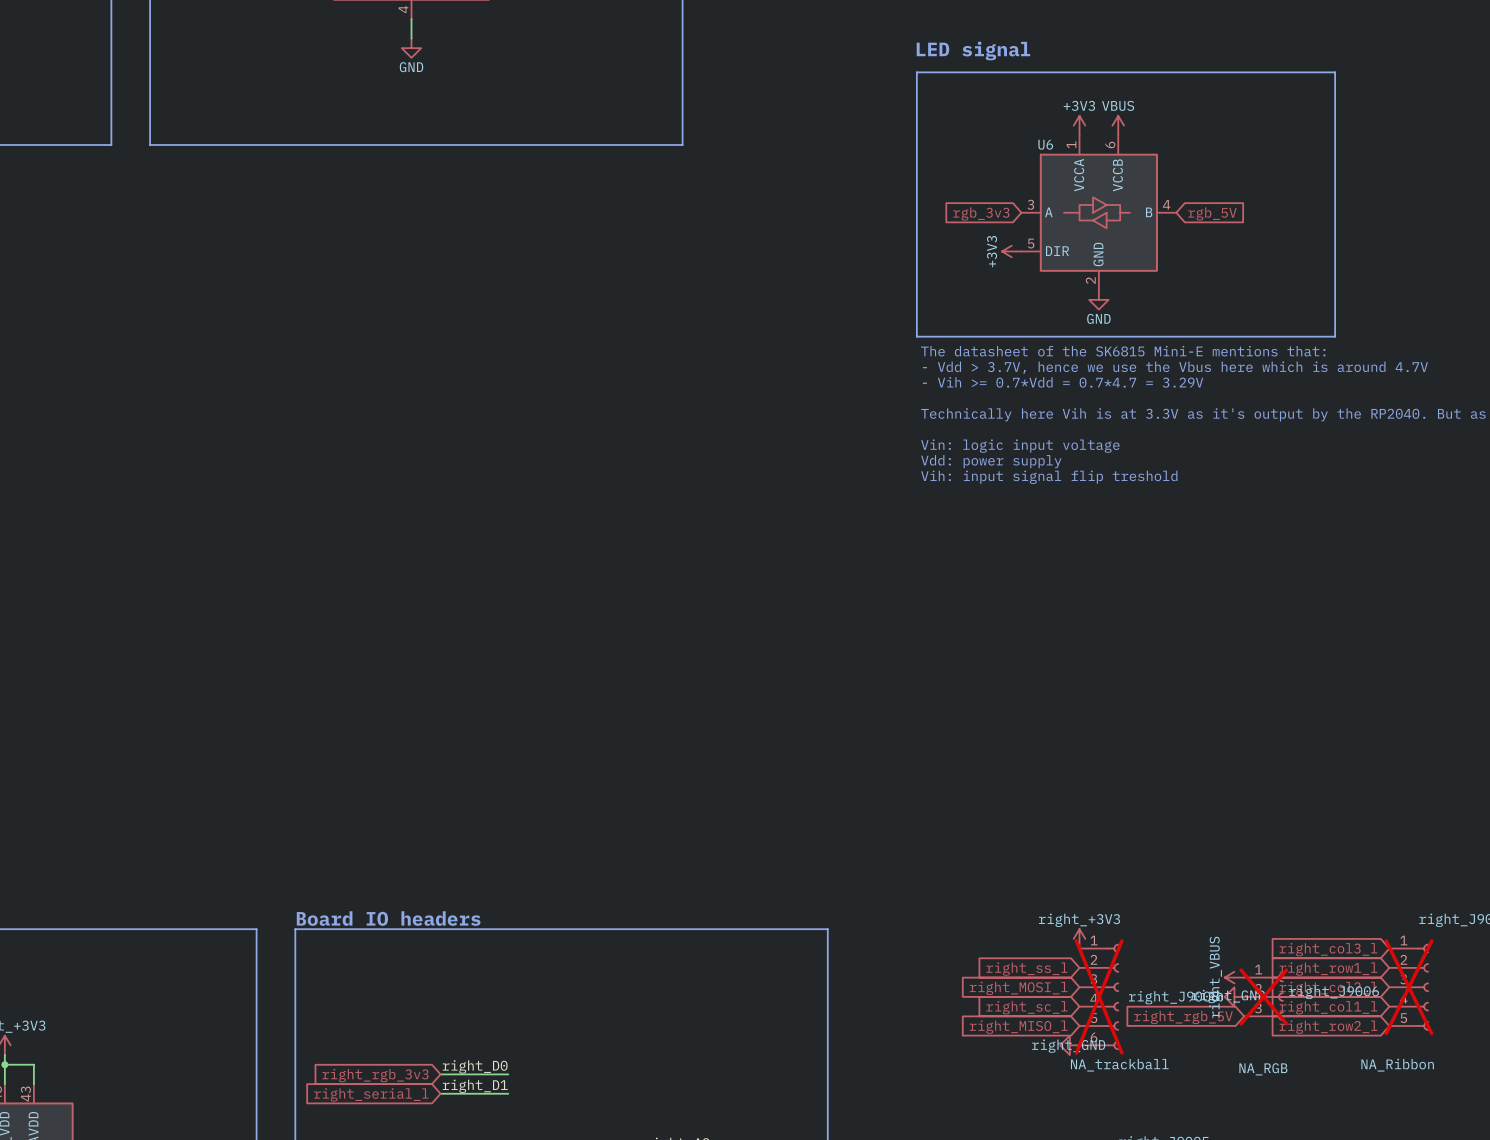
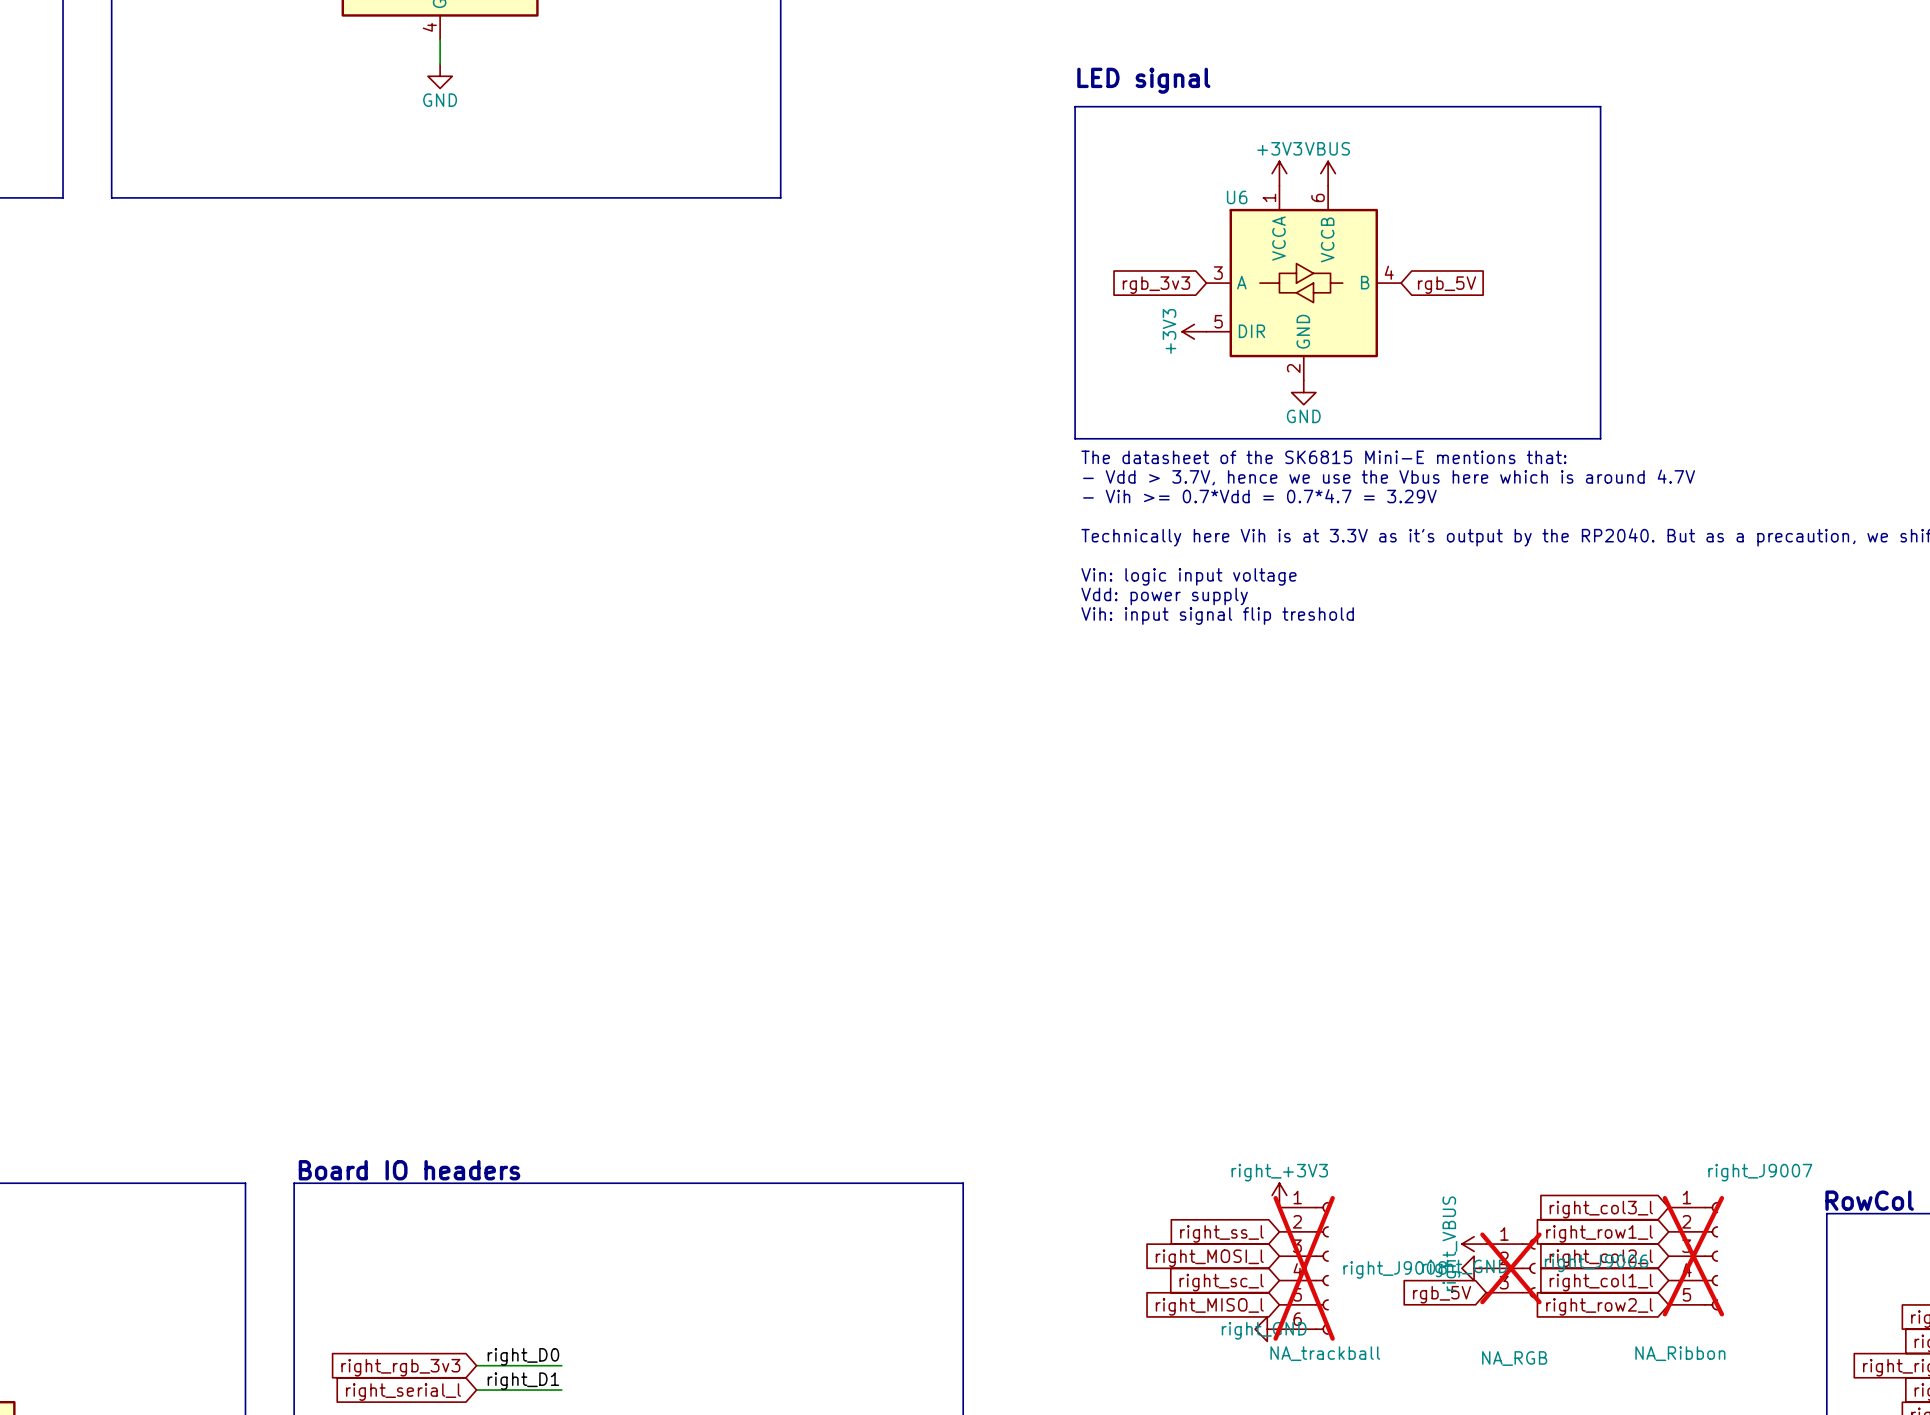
global label: right_rgb_5V (1183, 1017) -> rgb_5V (1442, 1294)

